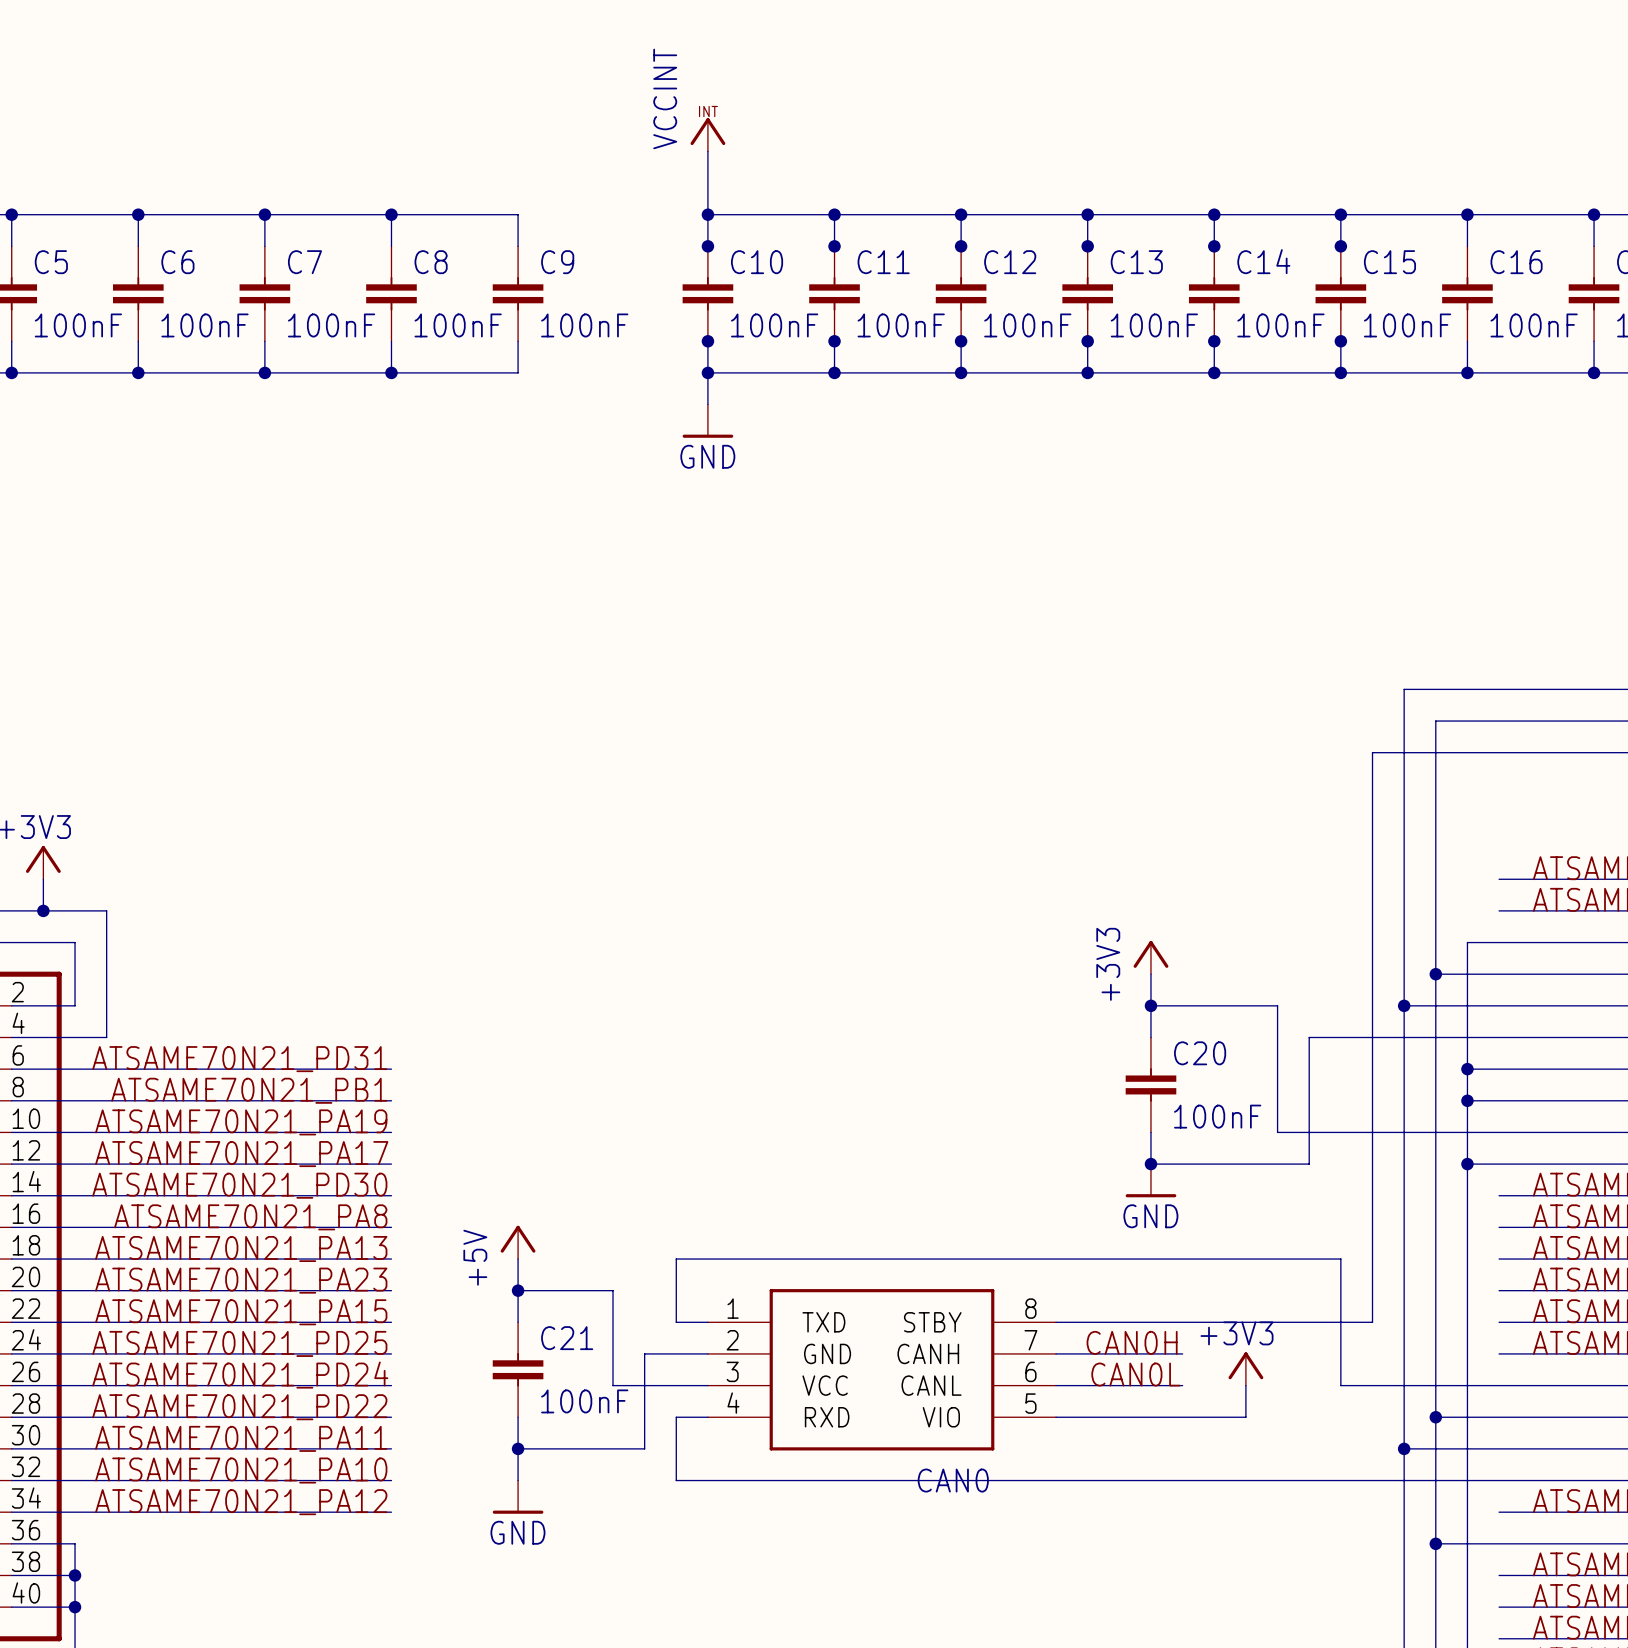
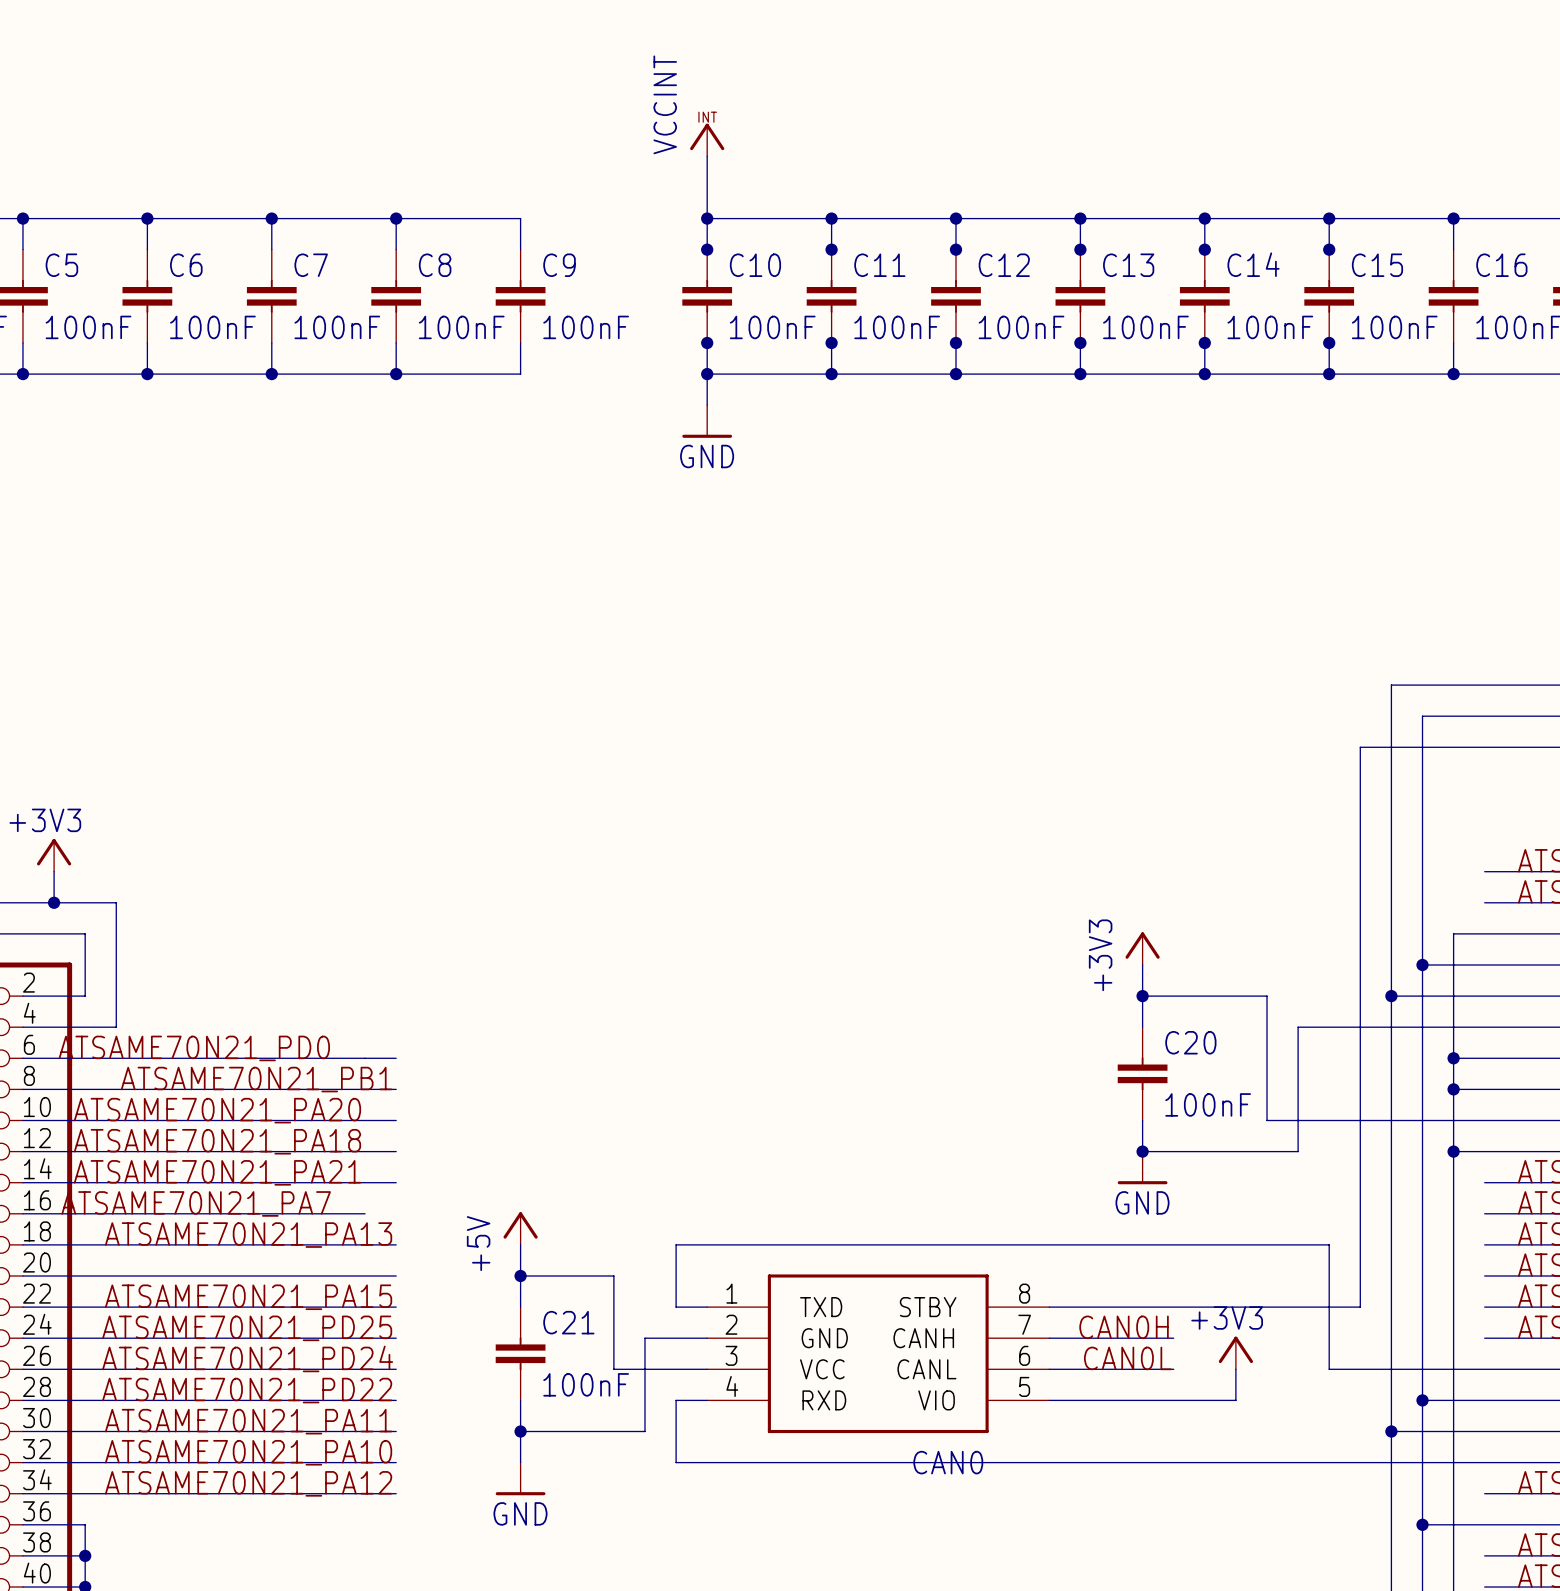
label: ATSAME70N21_PD31 (239, 1059) -> ATSAME70N21_PD0 (194, 1048)
label: none -> ATSAME70N21_PA20 (217, 1110)
label: ATSAME70N21_PA19 (241, 1122) -> none
label: none -> ATSAME70N21_PA18 (217, 1141)
label: ATSAME70N21_PA17 (241, 1154) -> none
label: none -> ATSAME70N21_PA21 (217, 1172)
label: ATSAME70N21_PD30 (239, 1185) -> none
label: none -> ATSAME70N21_PA7 (196, 1203)
label: ATSAME70N21_PA8 (250, 1217) -> none
wire: (359, 1227) (391, 1227) -> none
label: ATSAME70N21_PA23 (241, 1280) -> none

